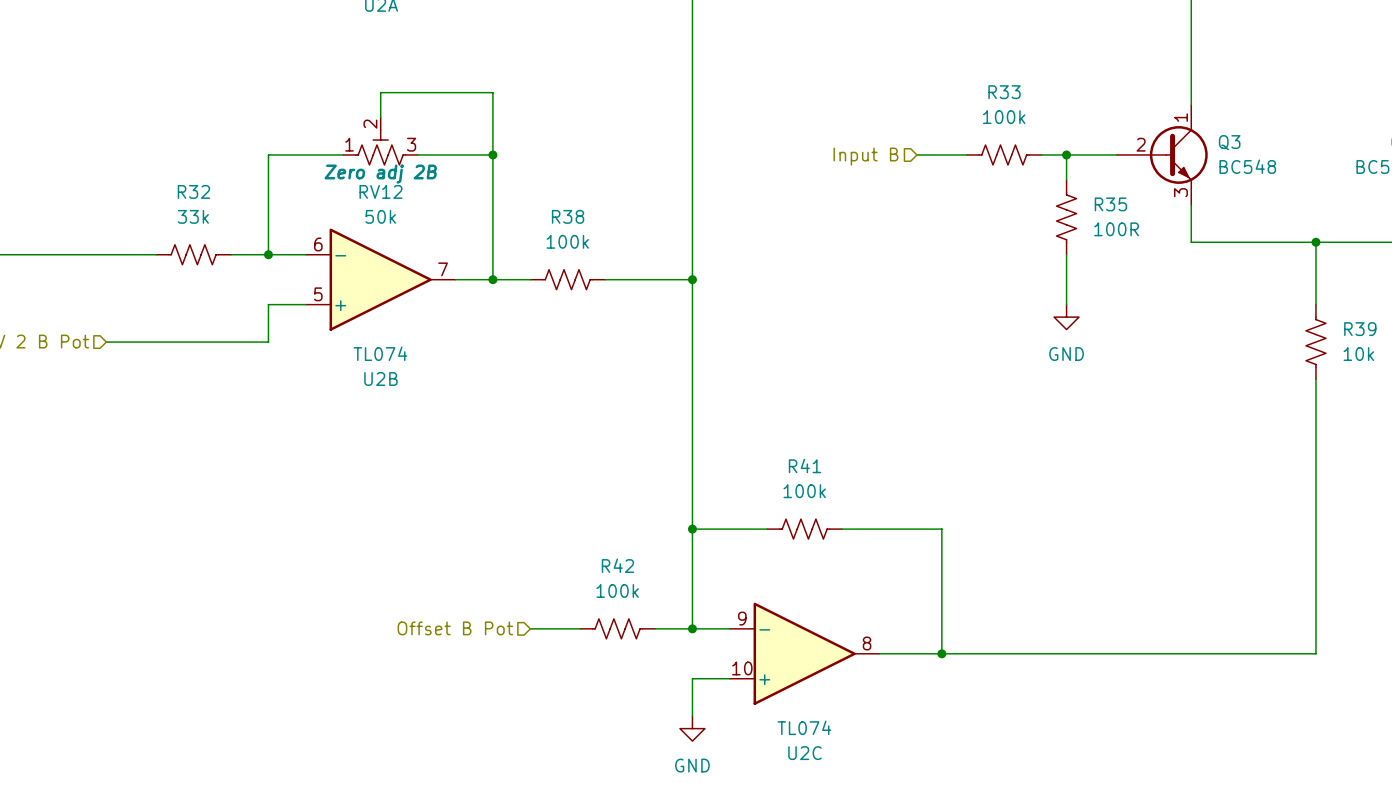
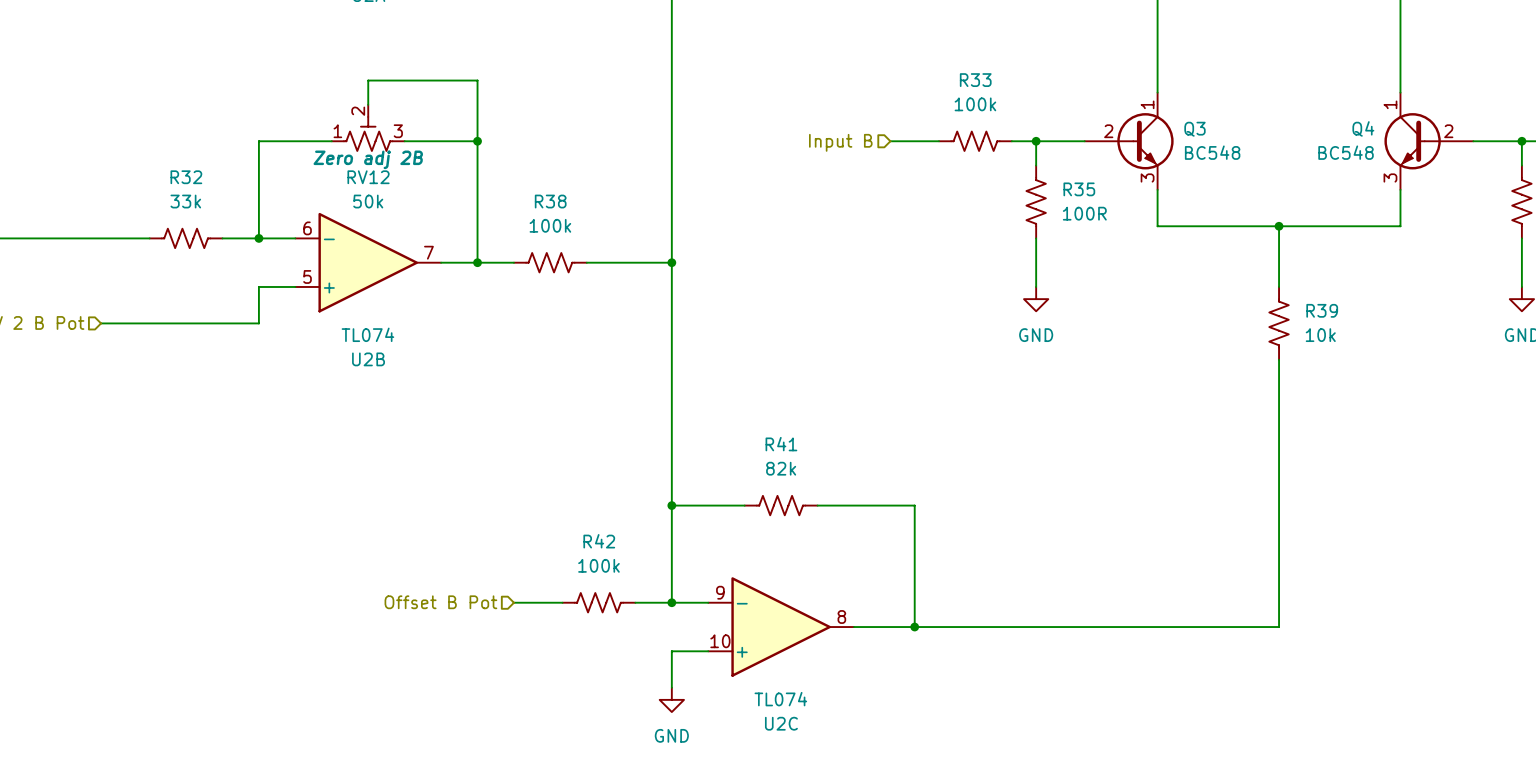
R41 value: 100k (804, 491) -> 82k (781, 468)

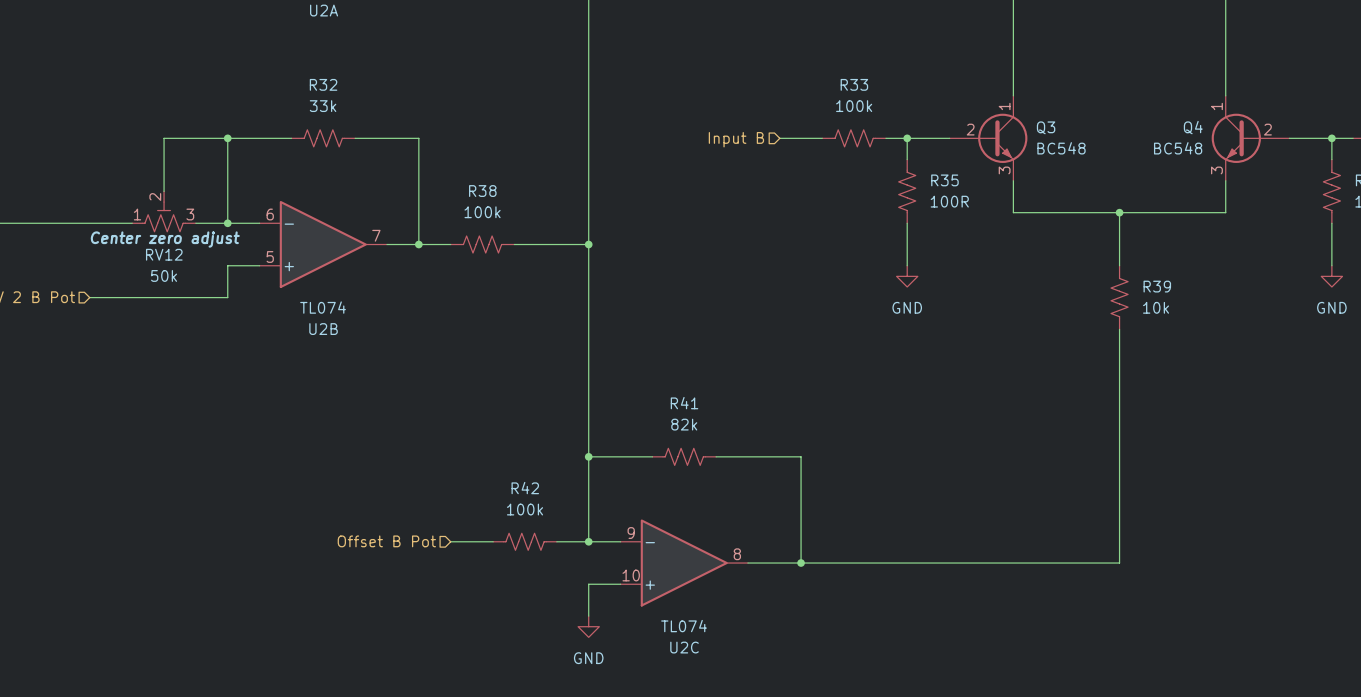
wire: (368, 104) (368, 80) (477, 80) (477, 141) -> none
RV12 position: (368, 127) -> (164, 211)
wire: none -> (227, 138) (164, 138) (164, 191)
junction: none -> (227, 138)
junction: (477, 141) -> none
RV12 text: Zero adj 2B (368, 159) -> Center zero adjust (165, 239)
R32 position: (186, 238) -> (323, 138)

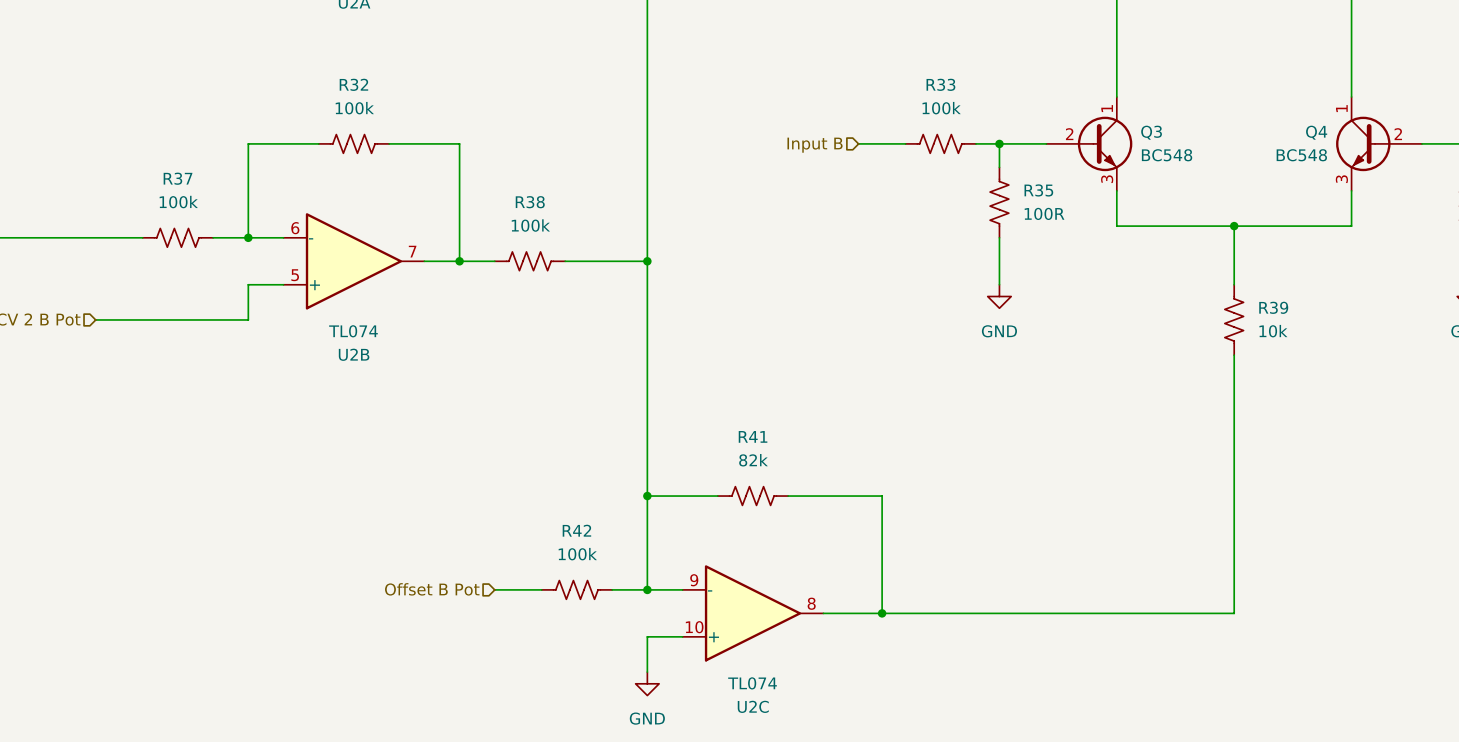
R32 value: 33k (323, 106) -> 100k (354, 108)
wire: (227, 138) (164, 138) (164, 191) -> none
junction: (227, 138) -> none
RV12: 50k (164, 211) -> none
R37: none -> 100k (177, 237)

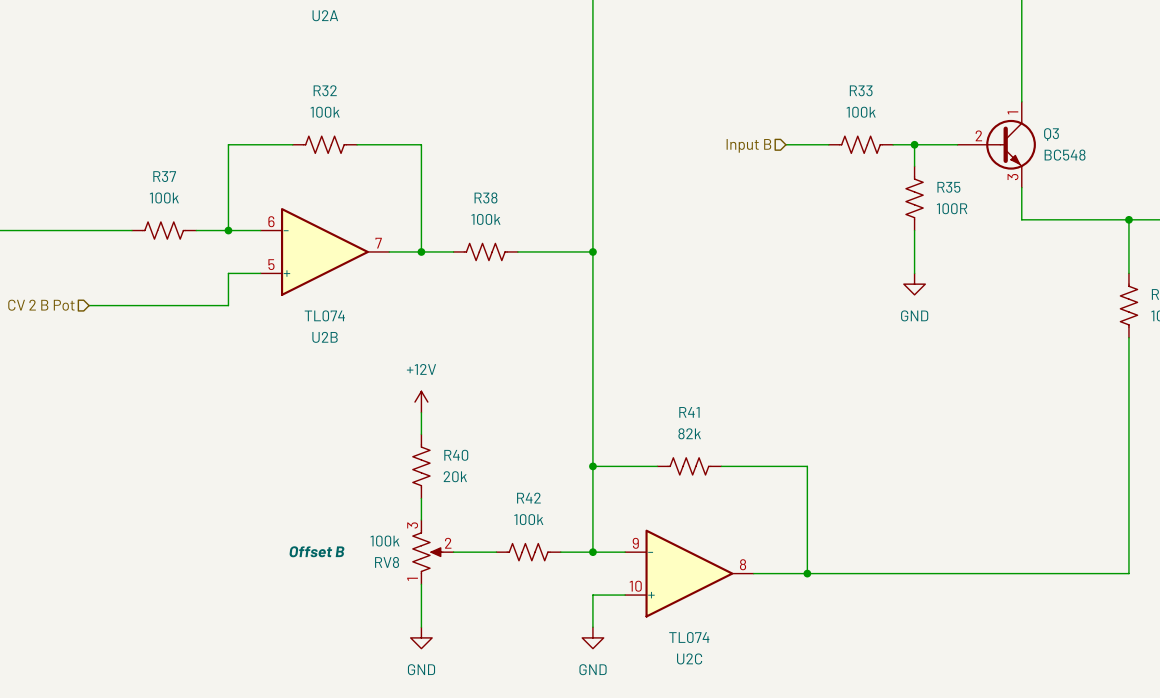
power symbol: none -> +12V (421, 402)
wire: none -> (421, 412) (421, 434)
R40: none -> 20k (421, 466)
wire: none -> (421, 498) (421, 519)
hierarchical label: Offset B Pot (432, 589) -> none
RV8: none -> 100k (433, 552)
wire: none -> (421, 584) (421, 627)
power symbol: none -> GND (421, 637)

